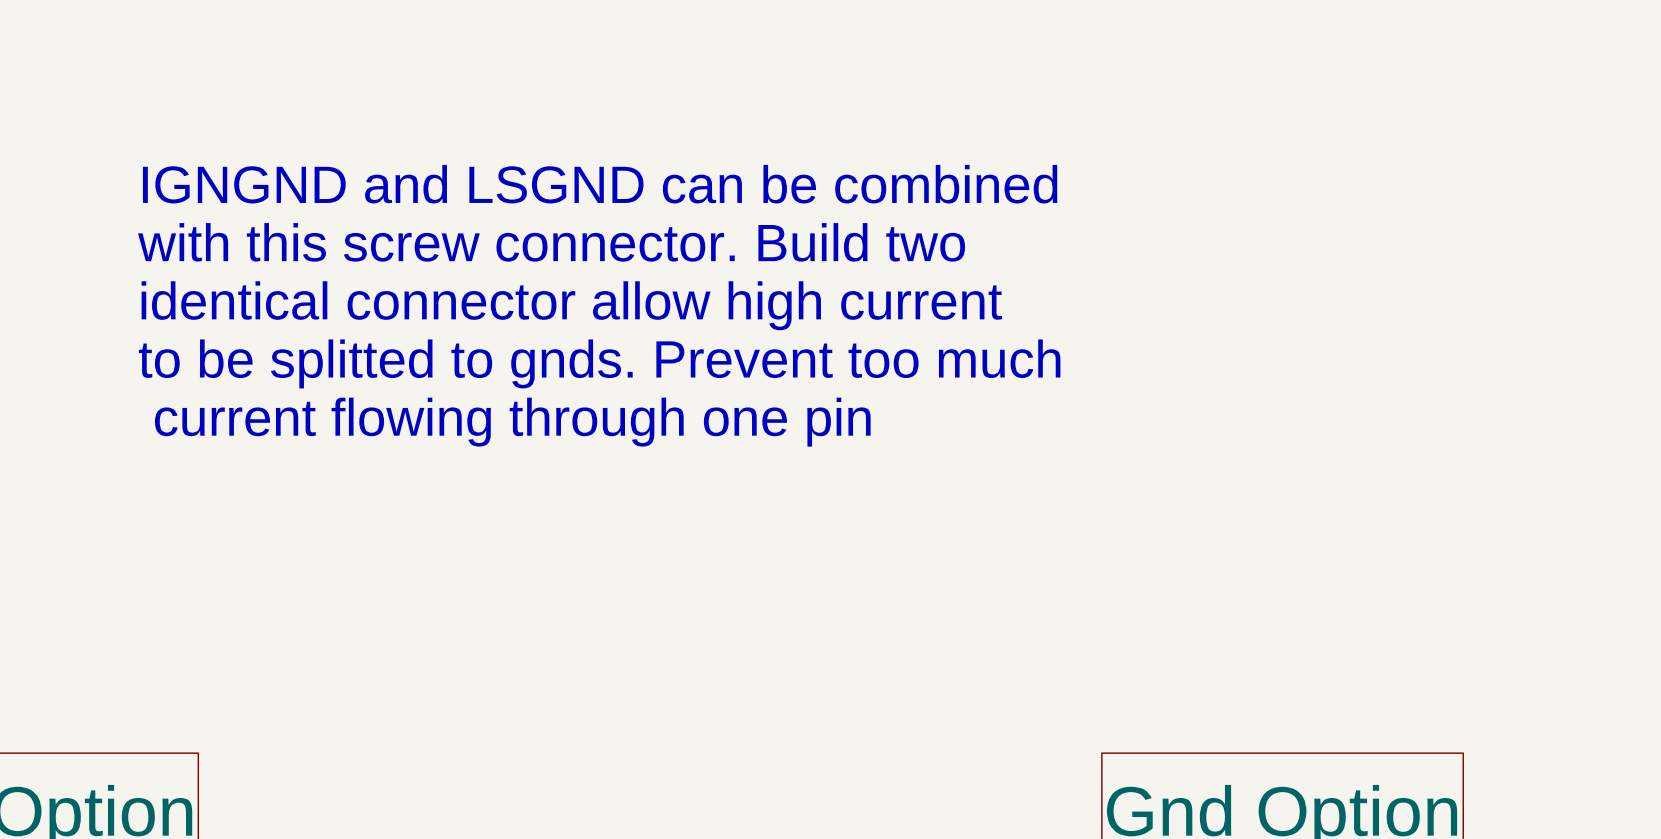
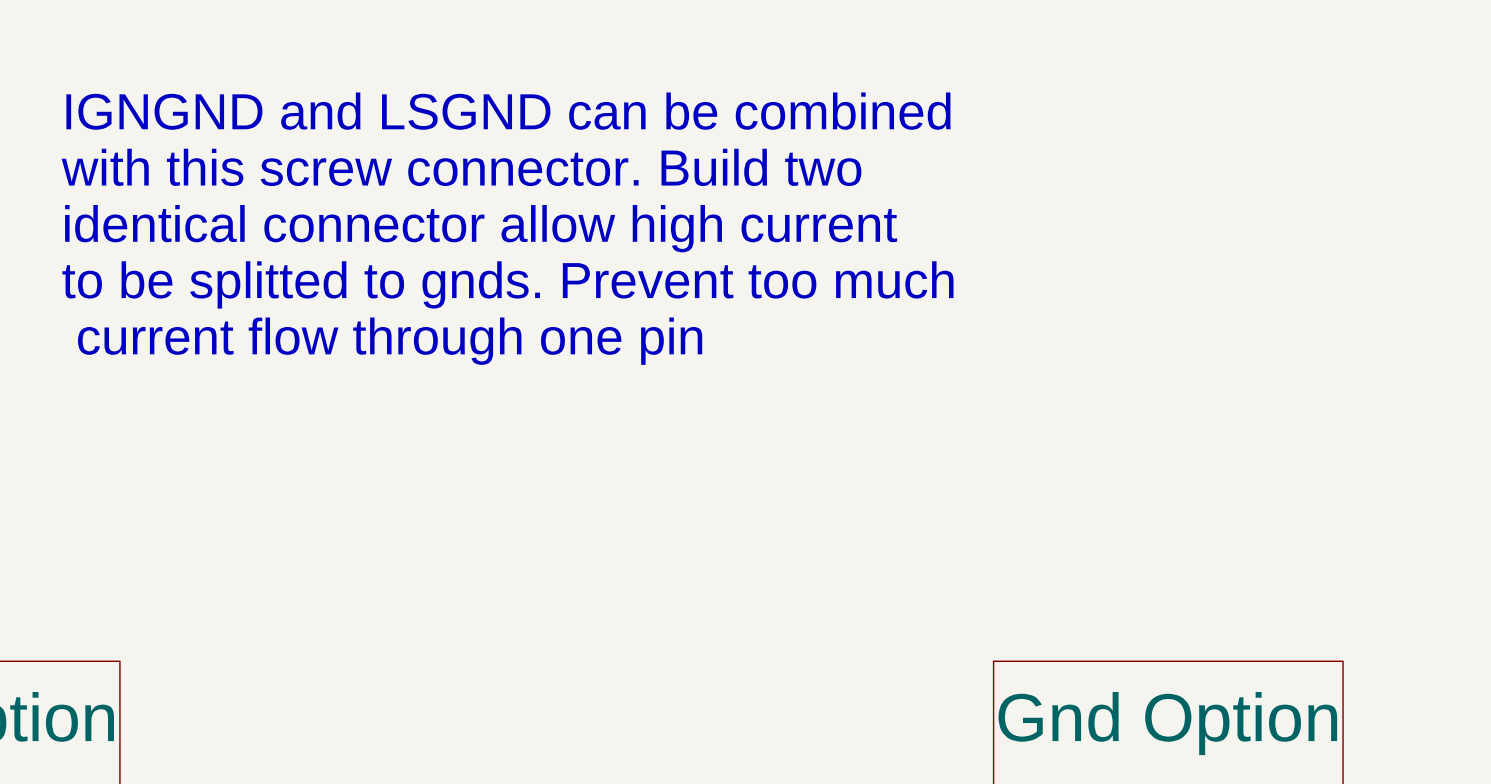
text: current flowing through one pin (512, 422) -> current flow through one pin (390, 341)

